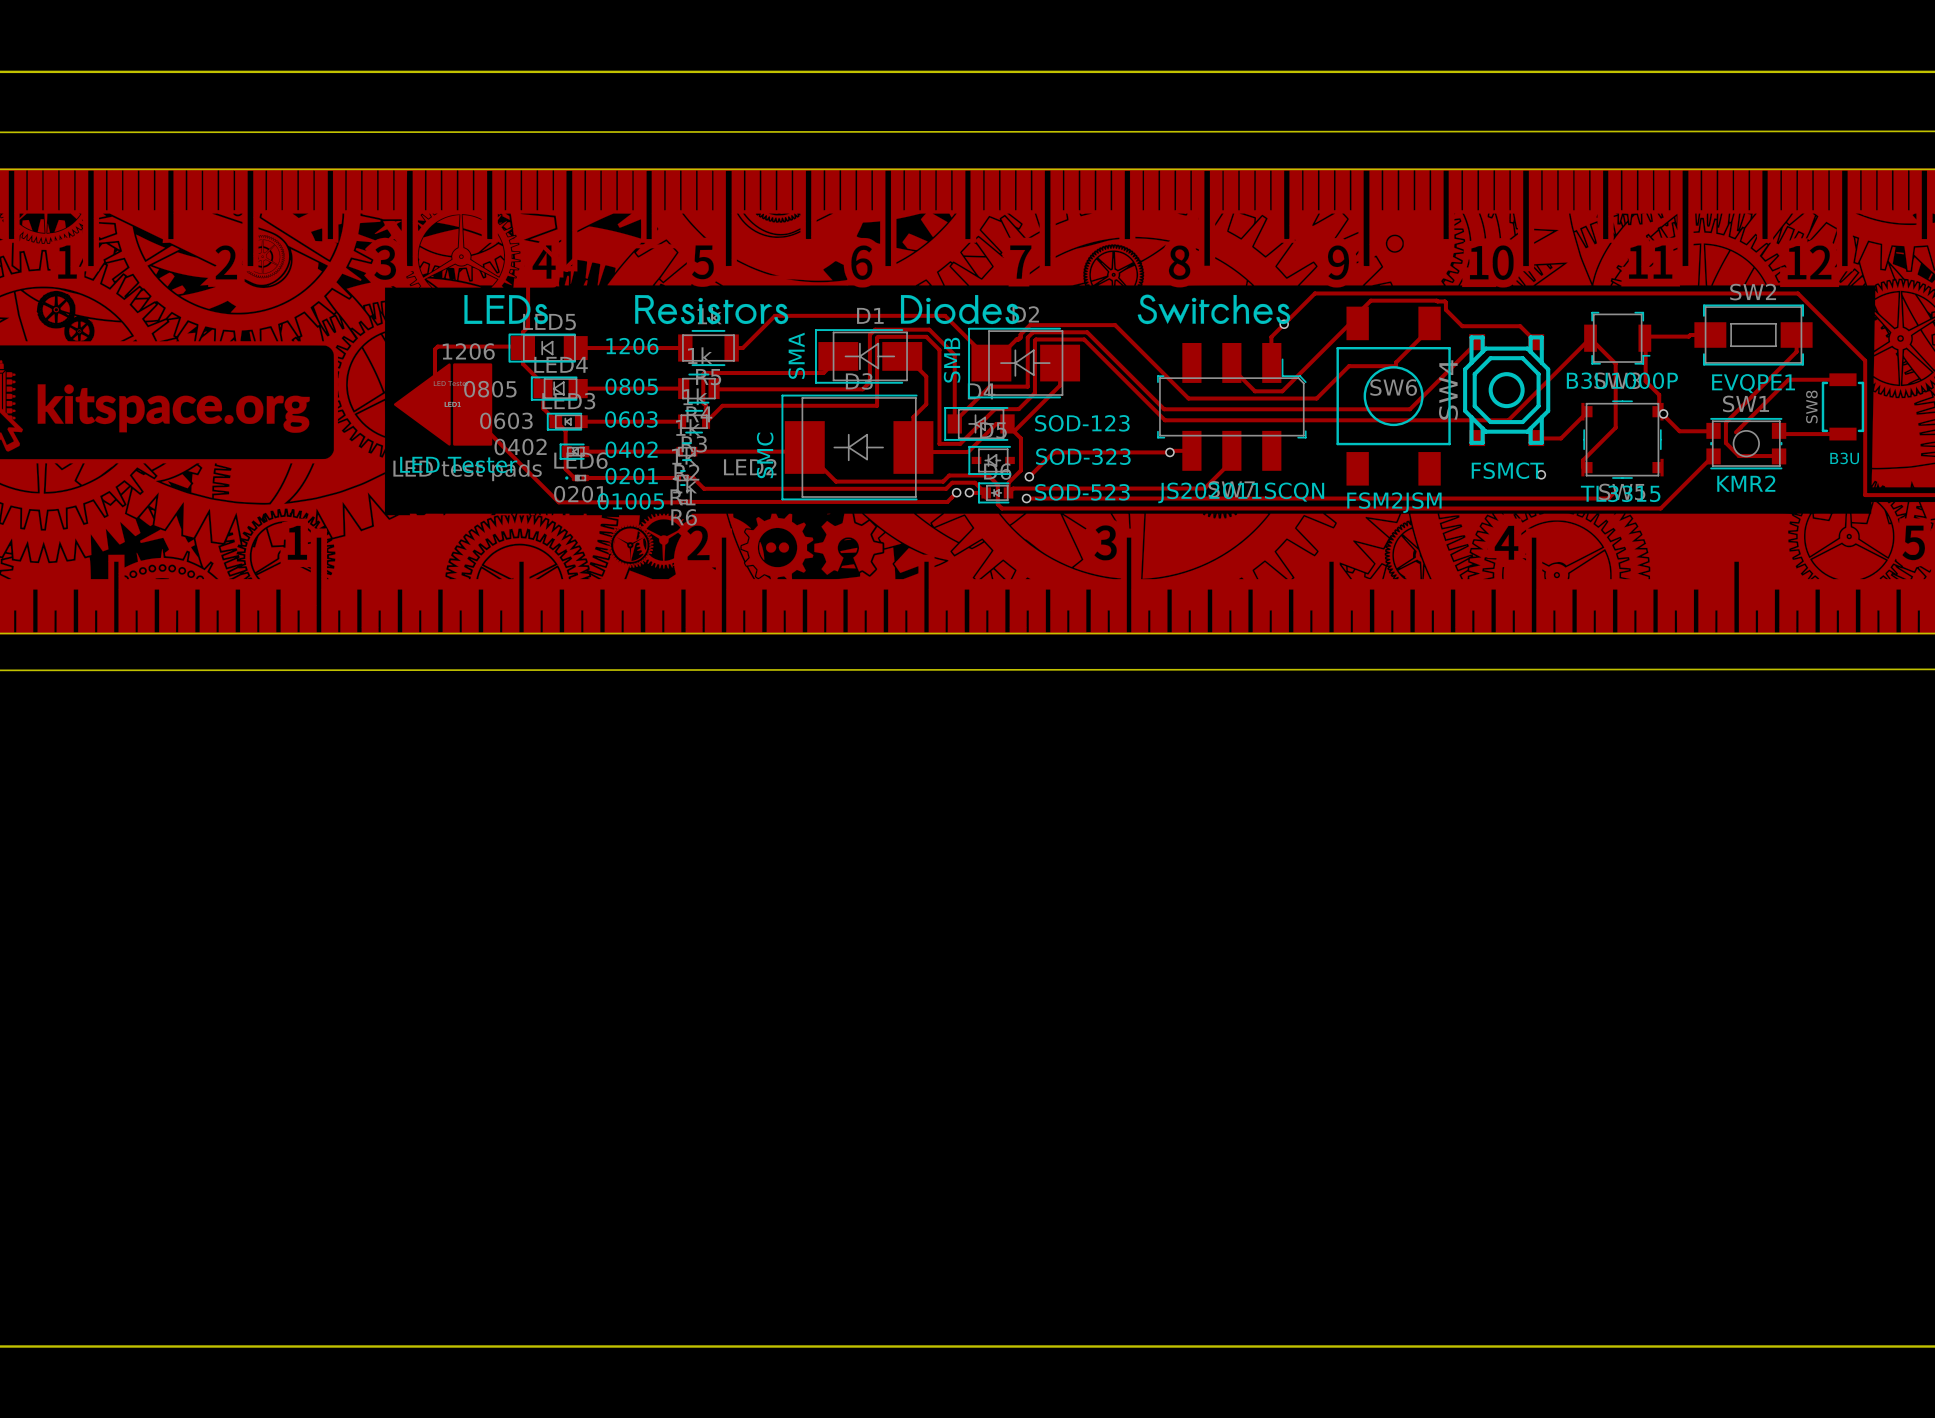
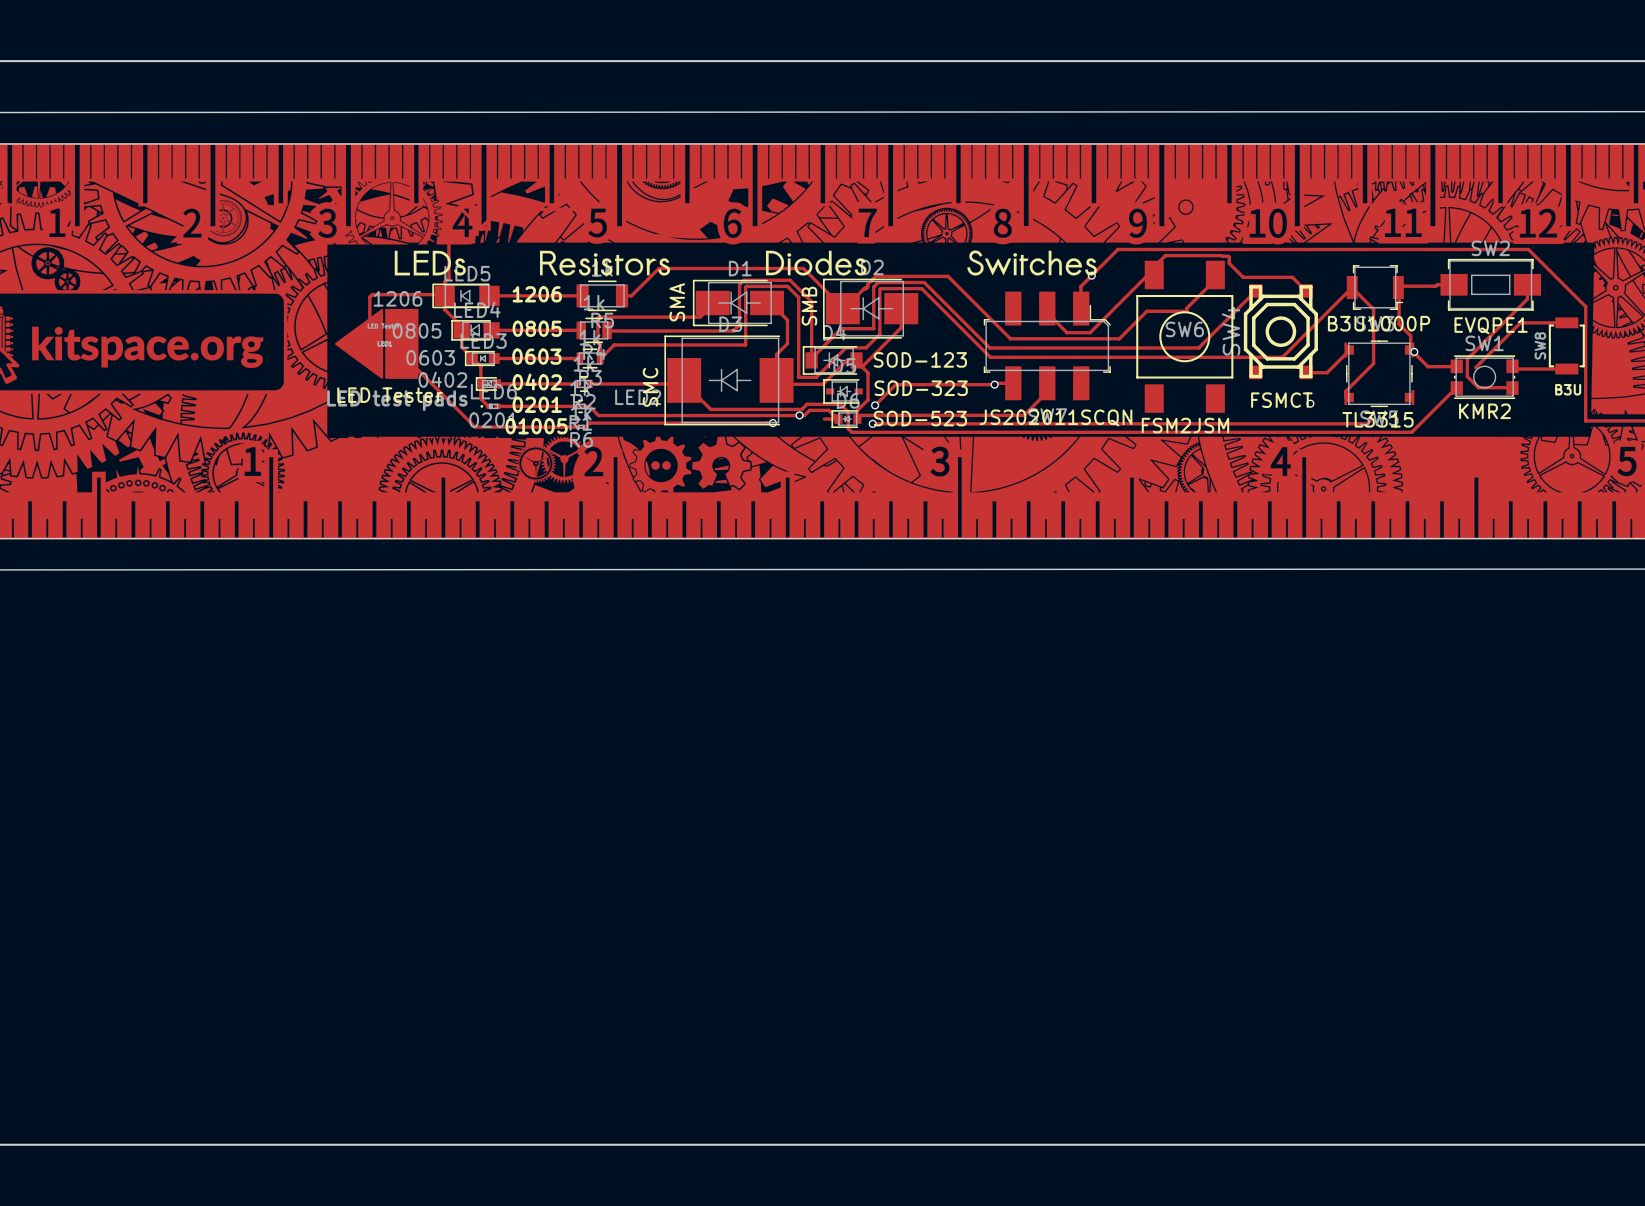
via: none -> (799, 415)
track: (956, 492) (947, 501) (689, 501) -> (772, 423) (589, 423) (586, 426)
via: (956, 492) -> none
via: (969, 492) -> none
via: none -> (772, 423)

